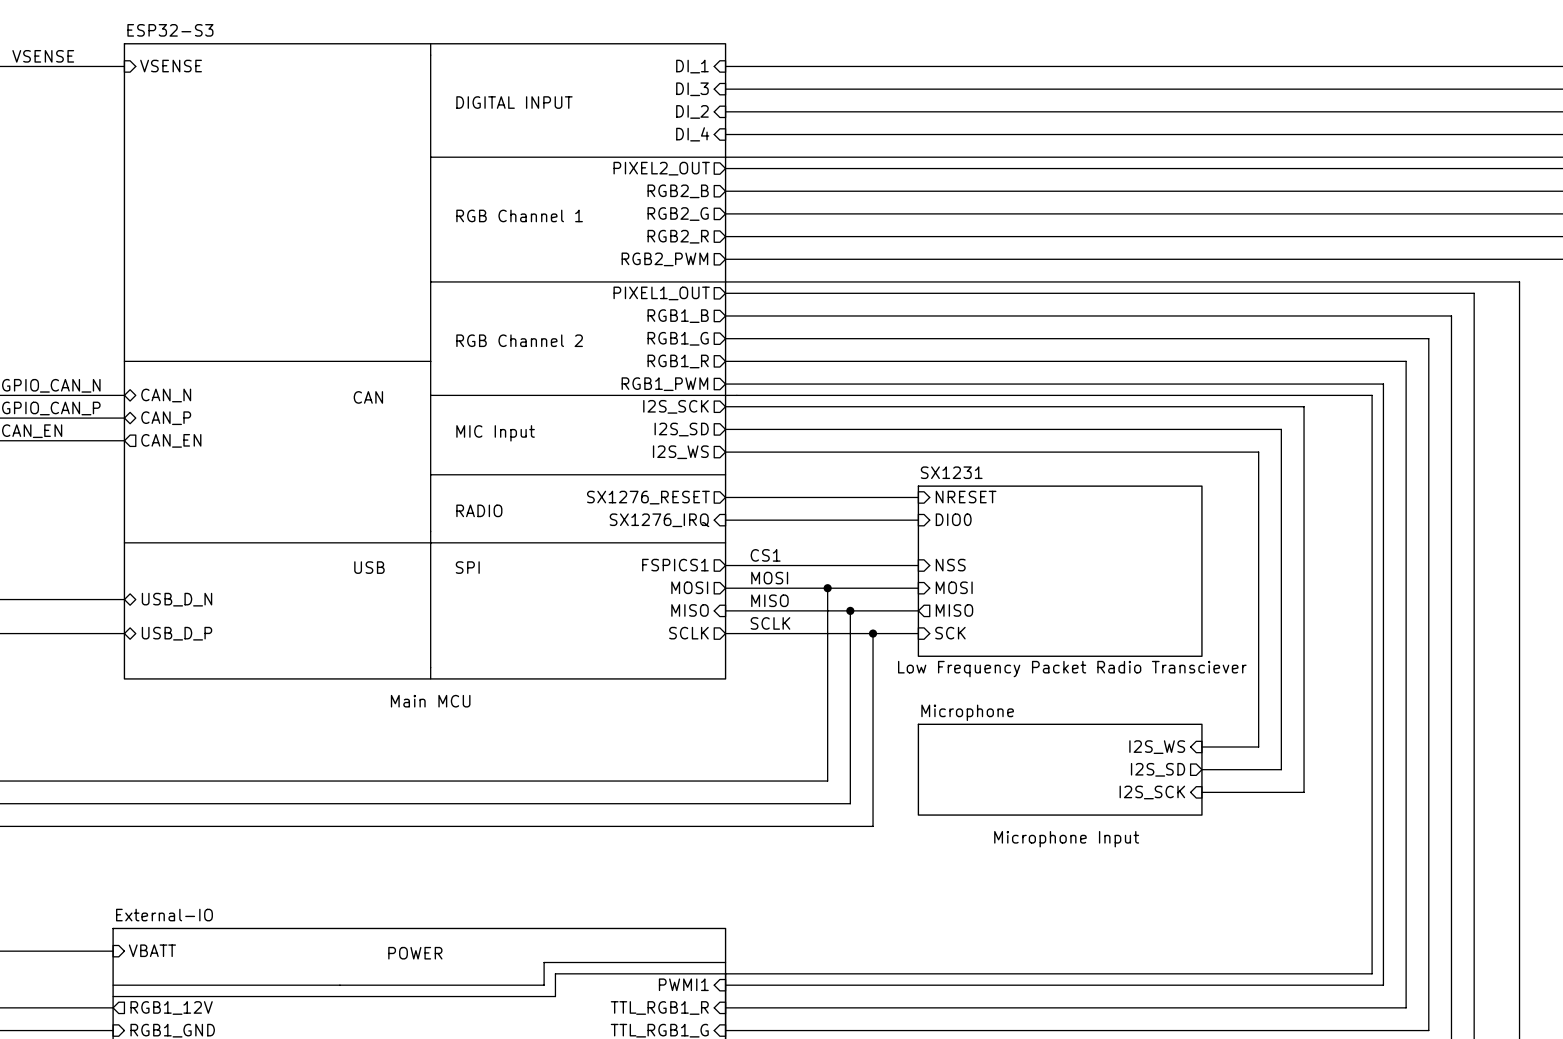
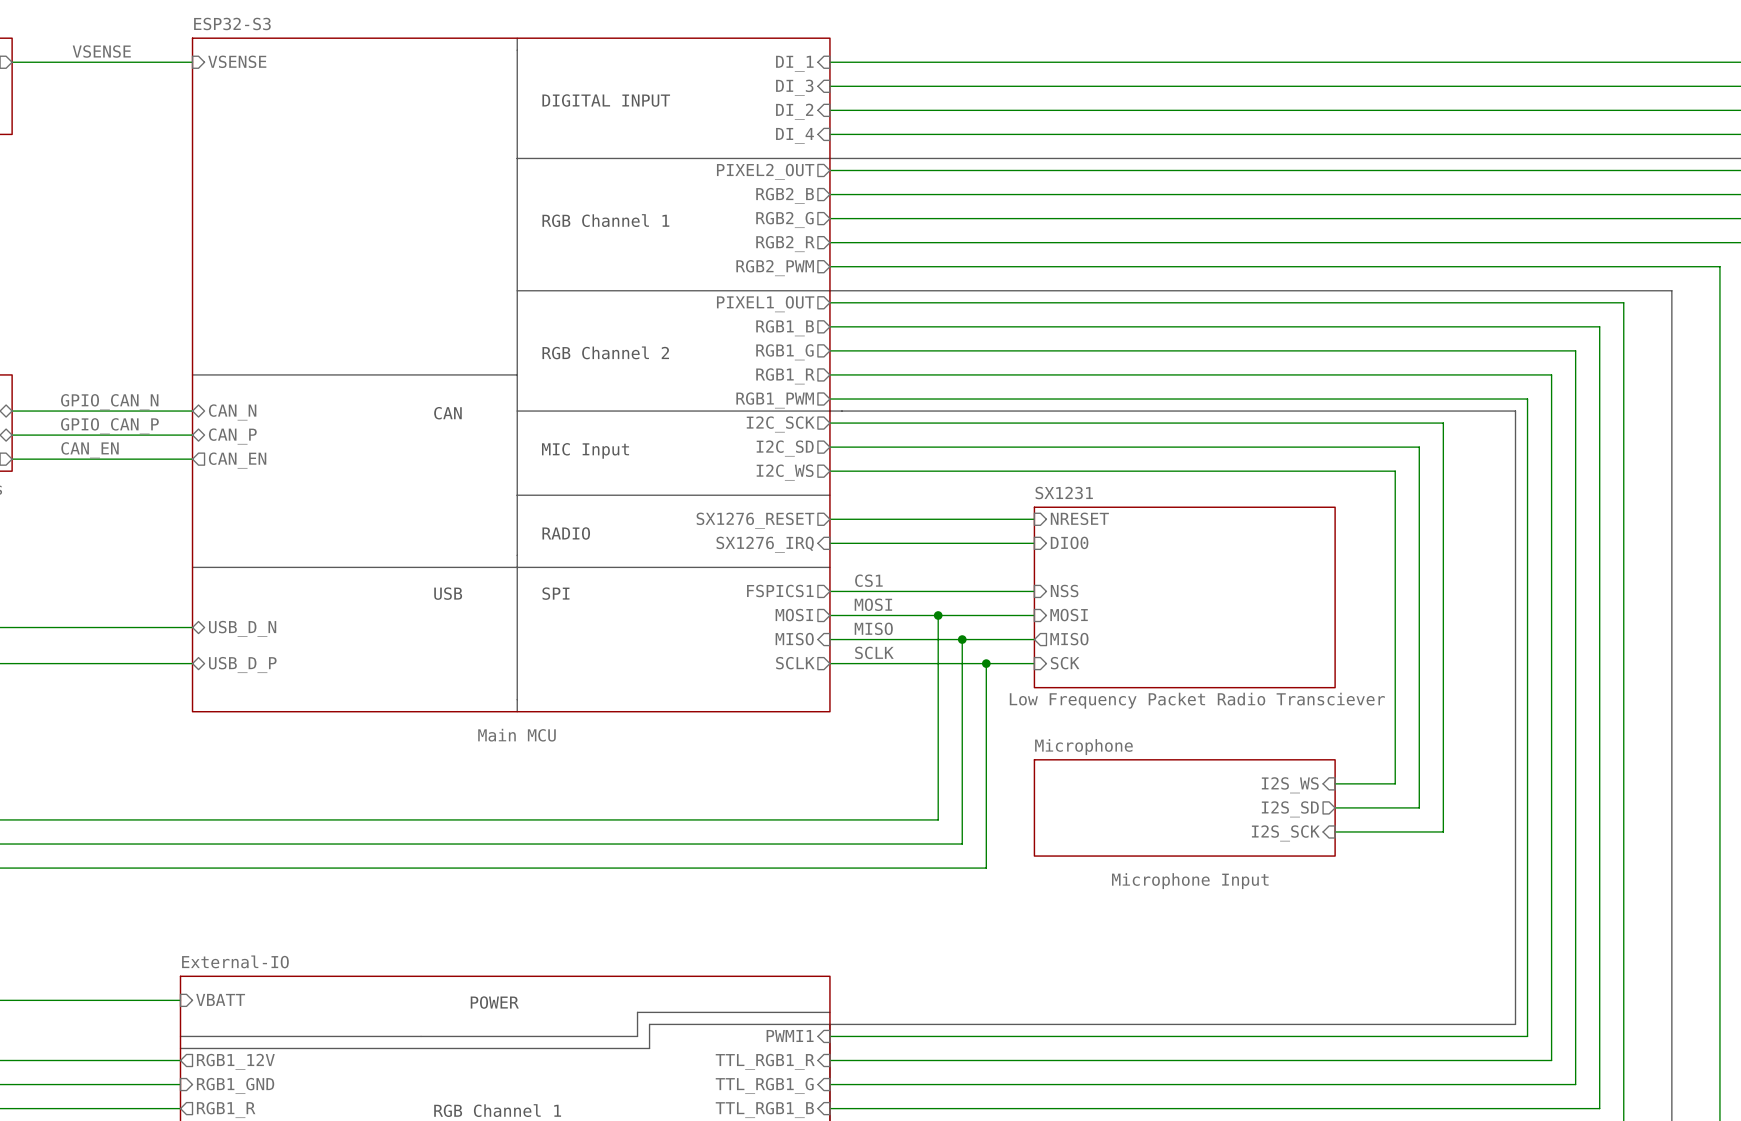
sheet pin: I2S_SCK (675, 406) -> I2C_SCK (780, 424)
sheet pin: I2S_SD (681, 429) -> I2C_SD (785, 448)
sheet pin: I2S_WS (680, 452) -> I2C_WS (785, 472)

